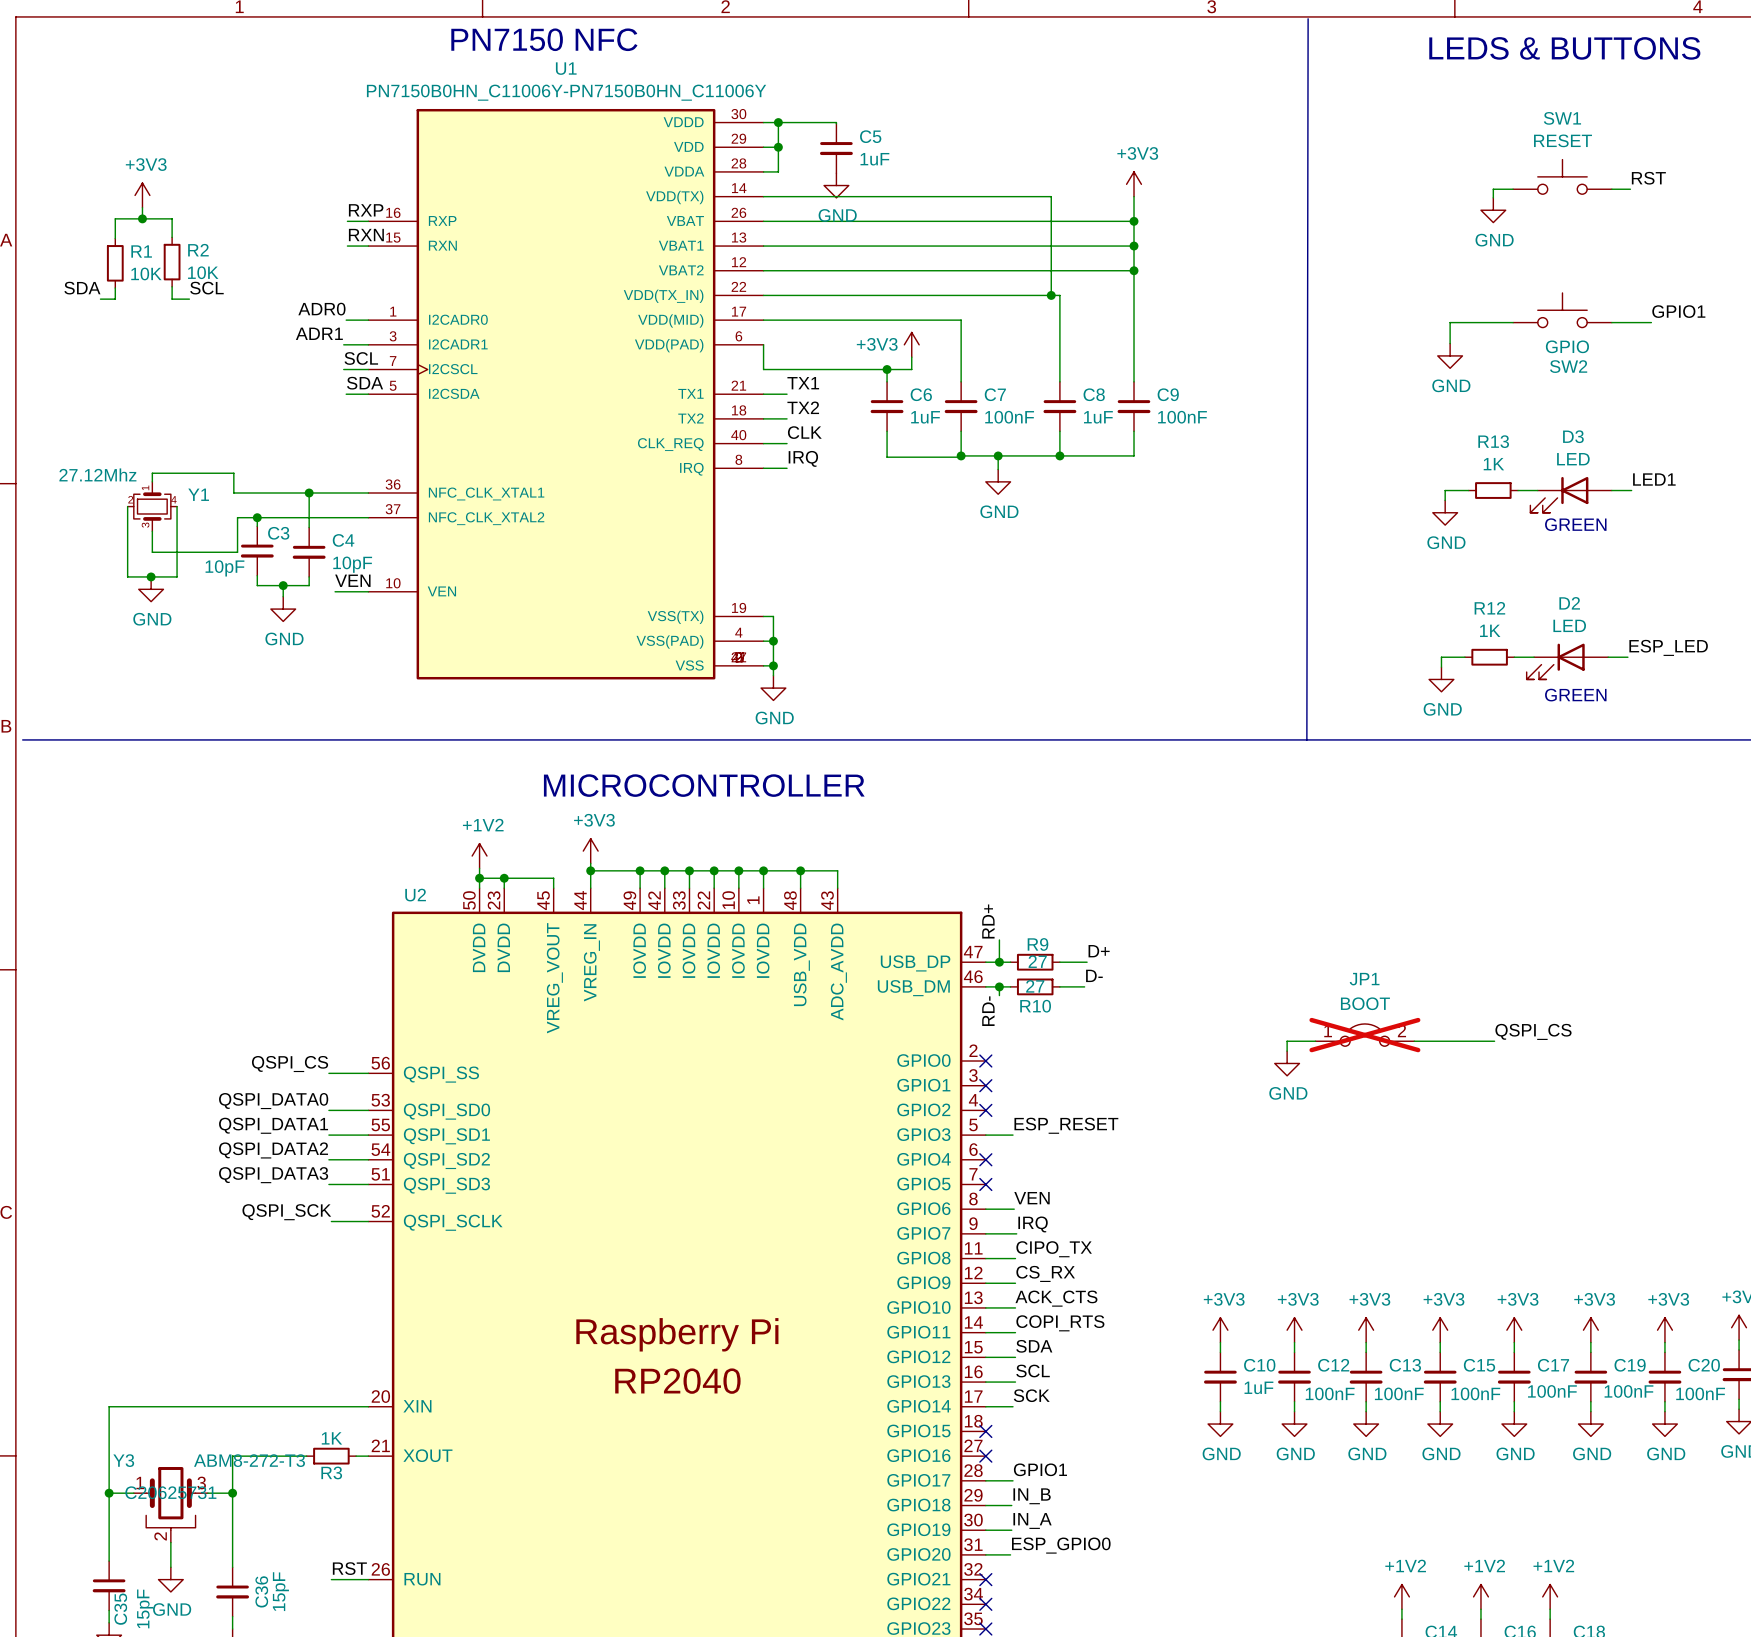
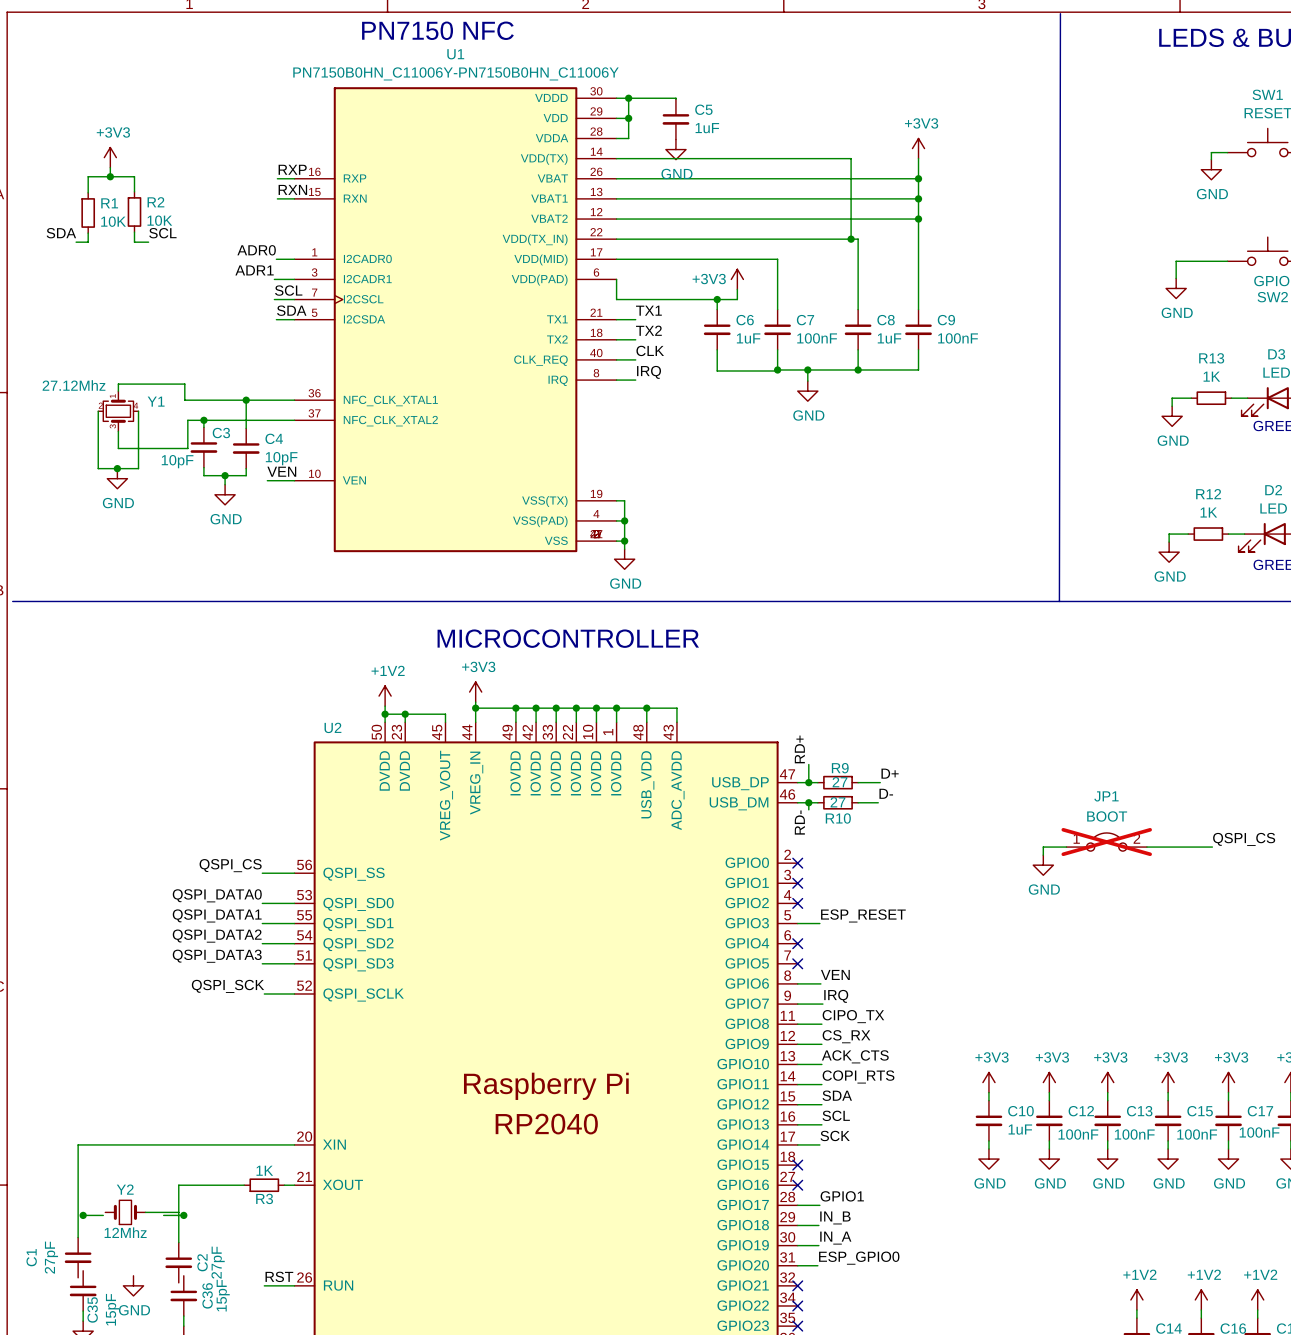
wire: (109, 1406) (109, 1561) -> (83, 1144) (78, 1144) (78, 1237)
wire: (232, 1456) (232, 1567) -> (183, 1185) (178, 1185) (178, 1242)
Y2: none -> 12Mhz (125, 1212)
wire: none -> (145, 1212) (178, 1212)
Y3: ABM8-272-T3 (170, 1504) -> none
wire: (170, 1542) (170, 1567) -> none
C1: none -> 27pF (78, 1257)
C2: none -> 27pF (178, 1262)

